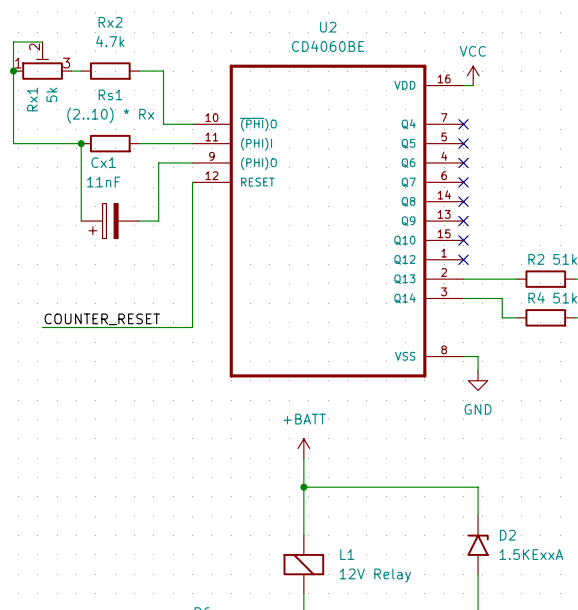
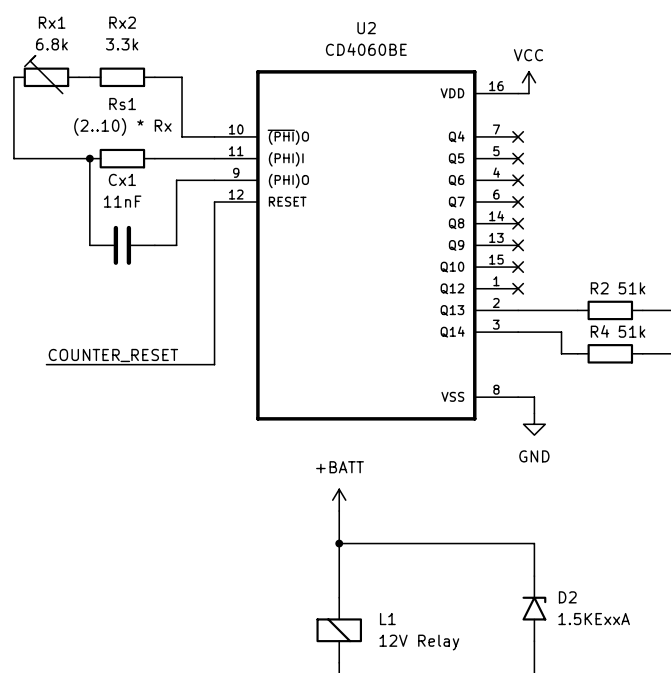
Rx2 value: 4.7k (110, 41) -> 3.3k (122, 44)
Rx1 symbol: [13, 42, 72, 80] -> [13, 55, 80, 94]
wire: (42, 42) (13, 42) (13, 71) -> none
junction: (13, 71) -> none
Rx1 value: 5k (51, 94) -> 6.8k (51, 44)
Rx1 name position: Rx1 (32, 99) -> Rx1 (52, 22)
Cx1 symbol: [81, 203, 140, 239] -> [89, 225, 155, 265]

